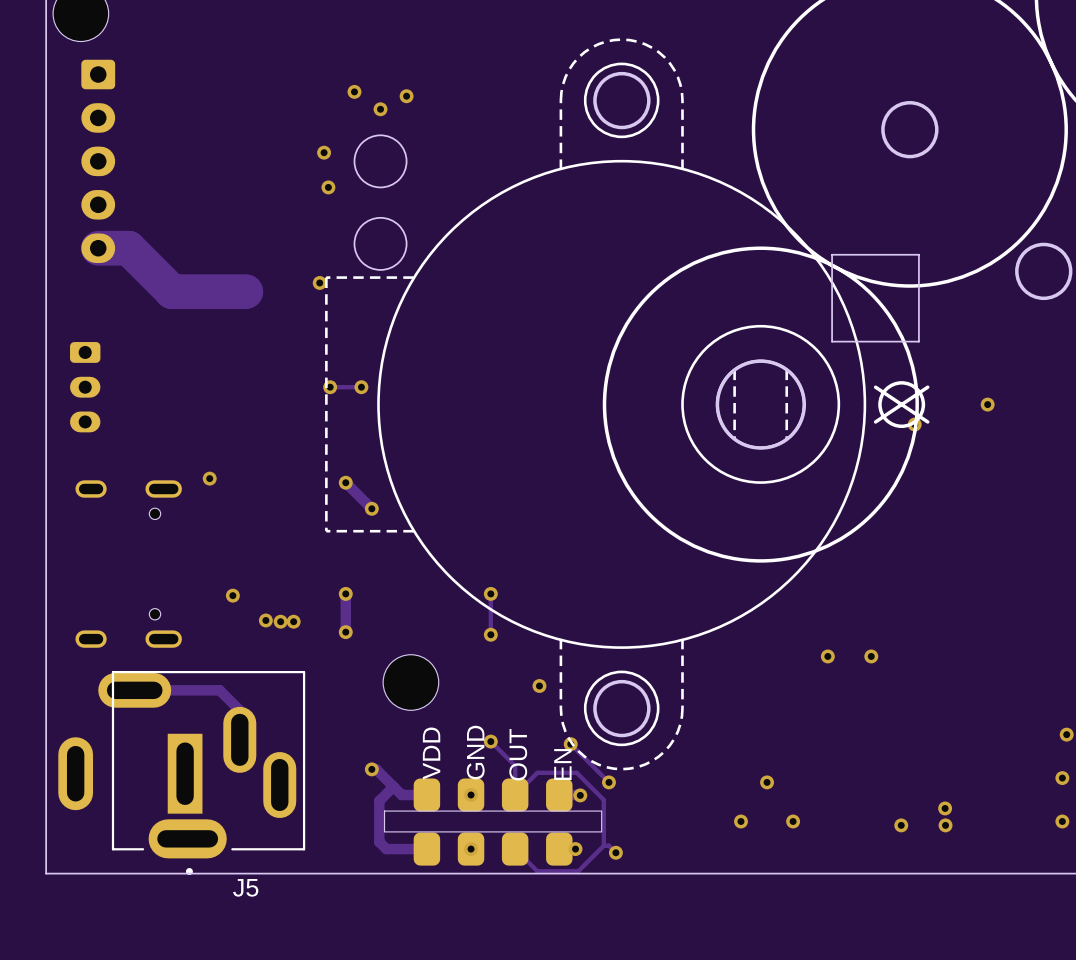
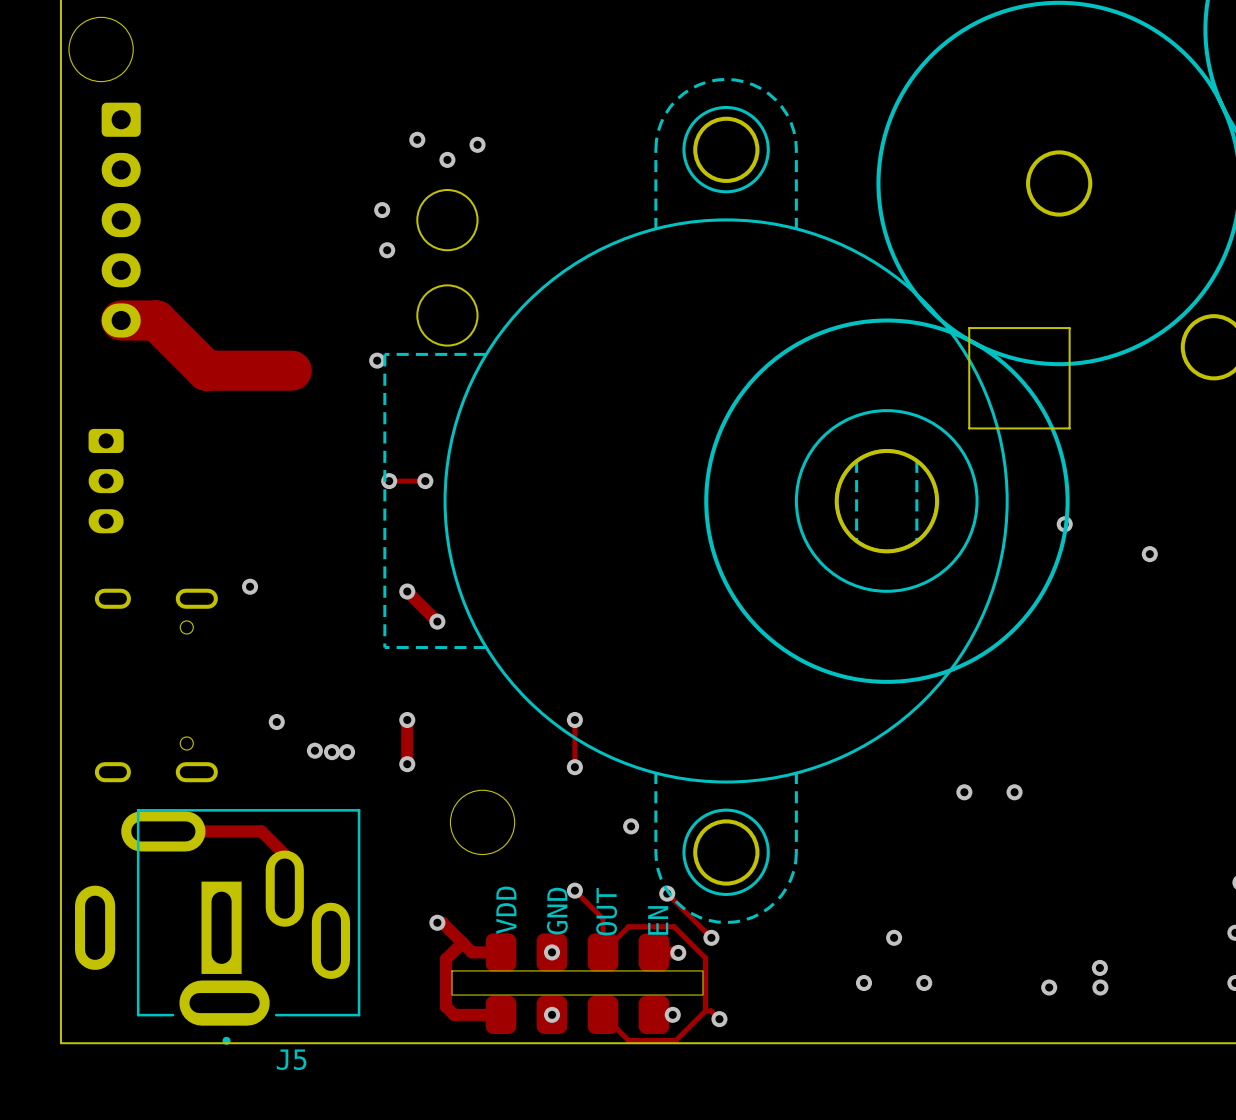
drawing: [878, 381, 926, 429] -> none
line: (875, 387) (927, 421) -> none
line: (927, 387) (875, 421) -> none
via position: (987, 404) -> (1149, 554)

